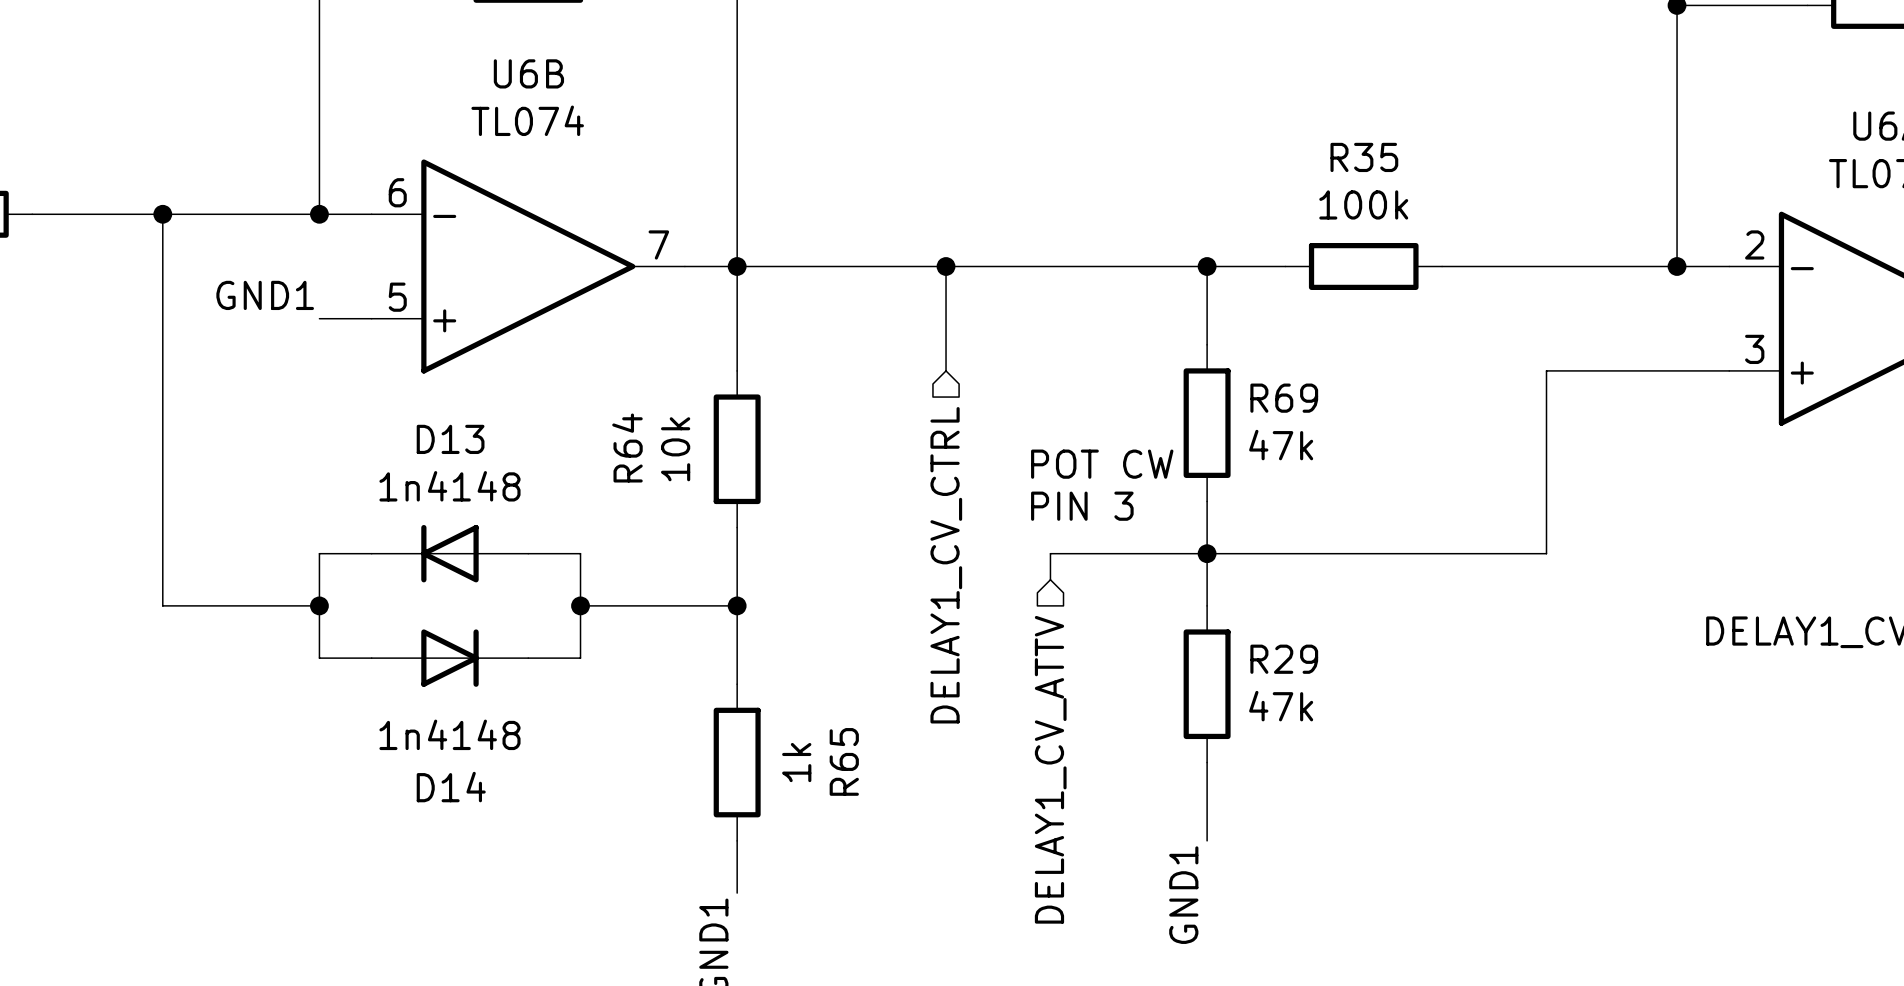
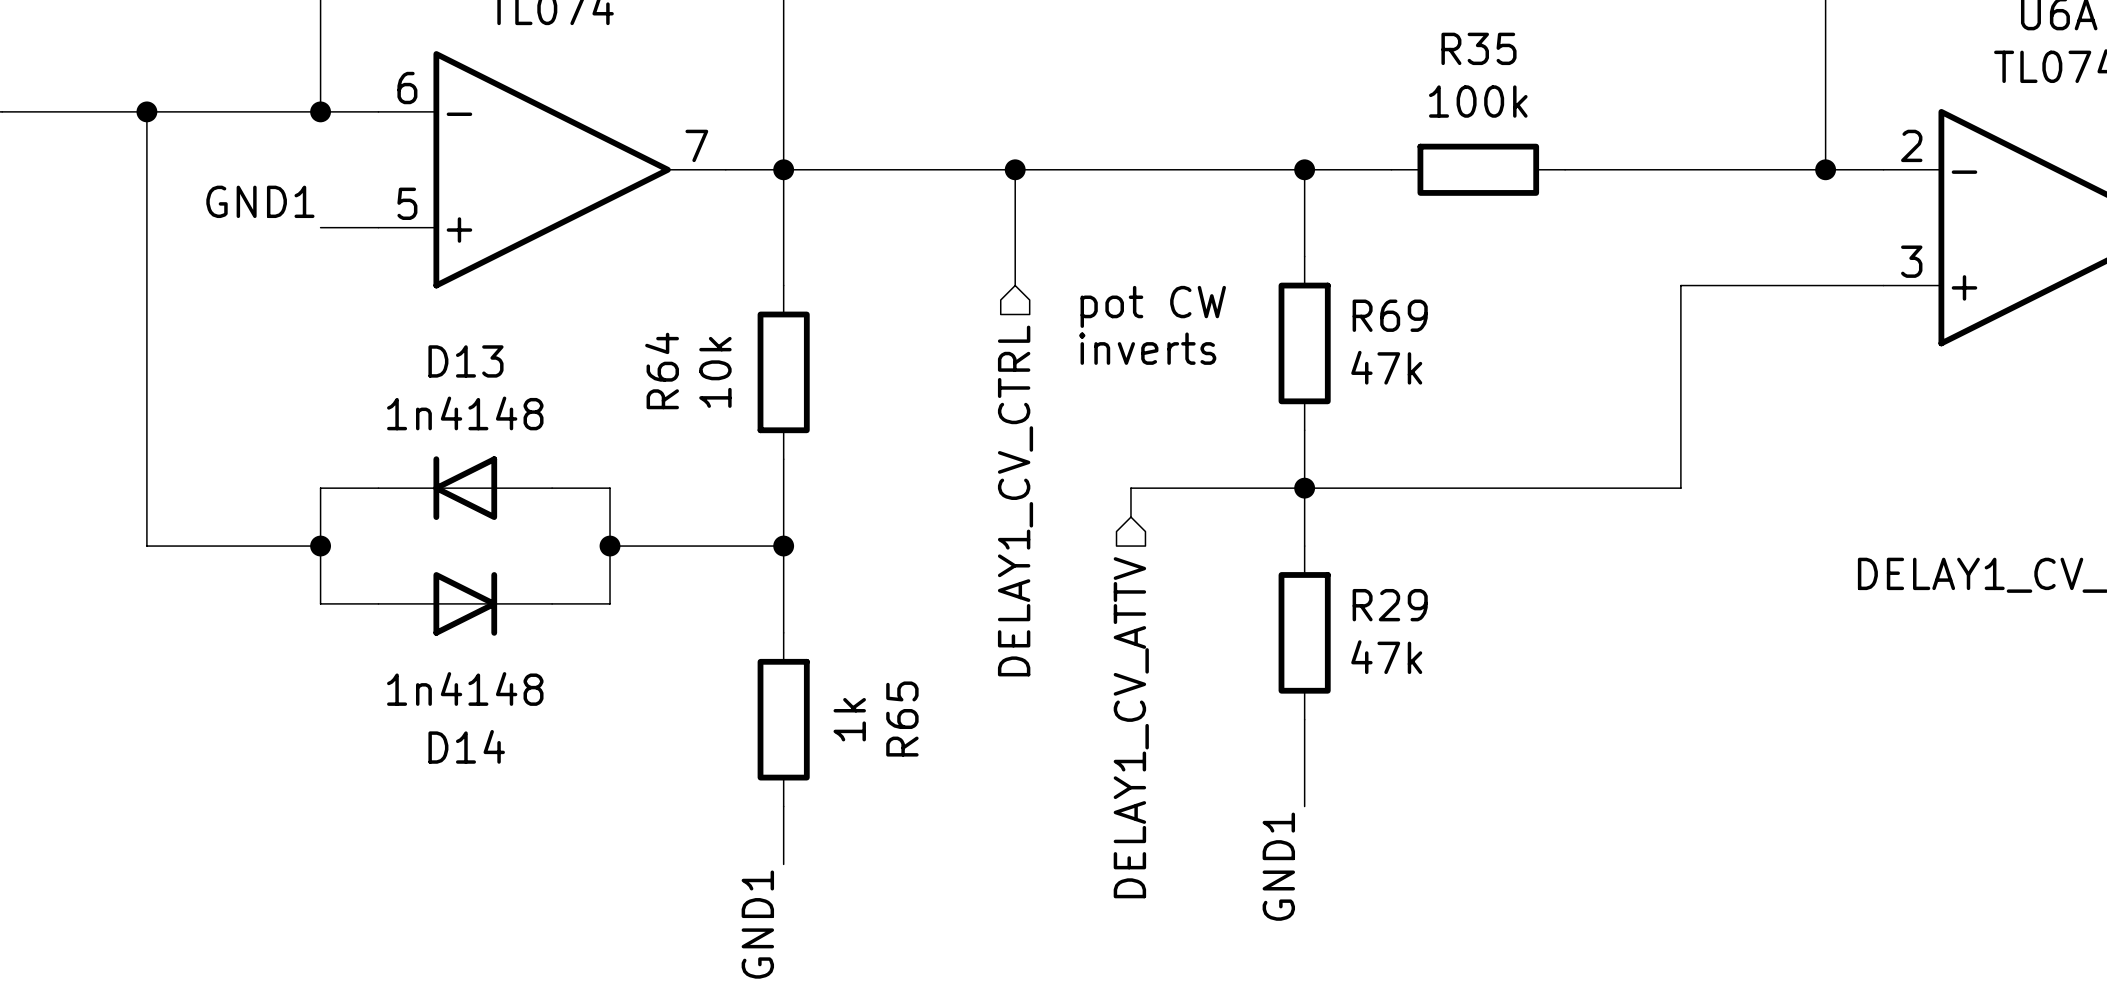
text: none -> pot CW (1153, 306)
text: none -> inverts (1147, 348)
text: POT CW (1102, 464) -> none
text: PIN 3 (1082, 506) -> none

